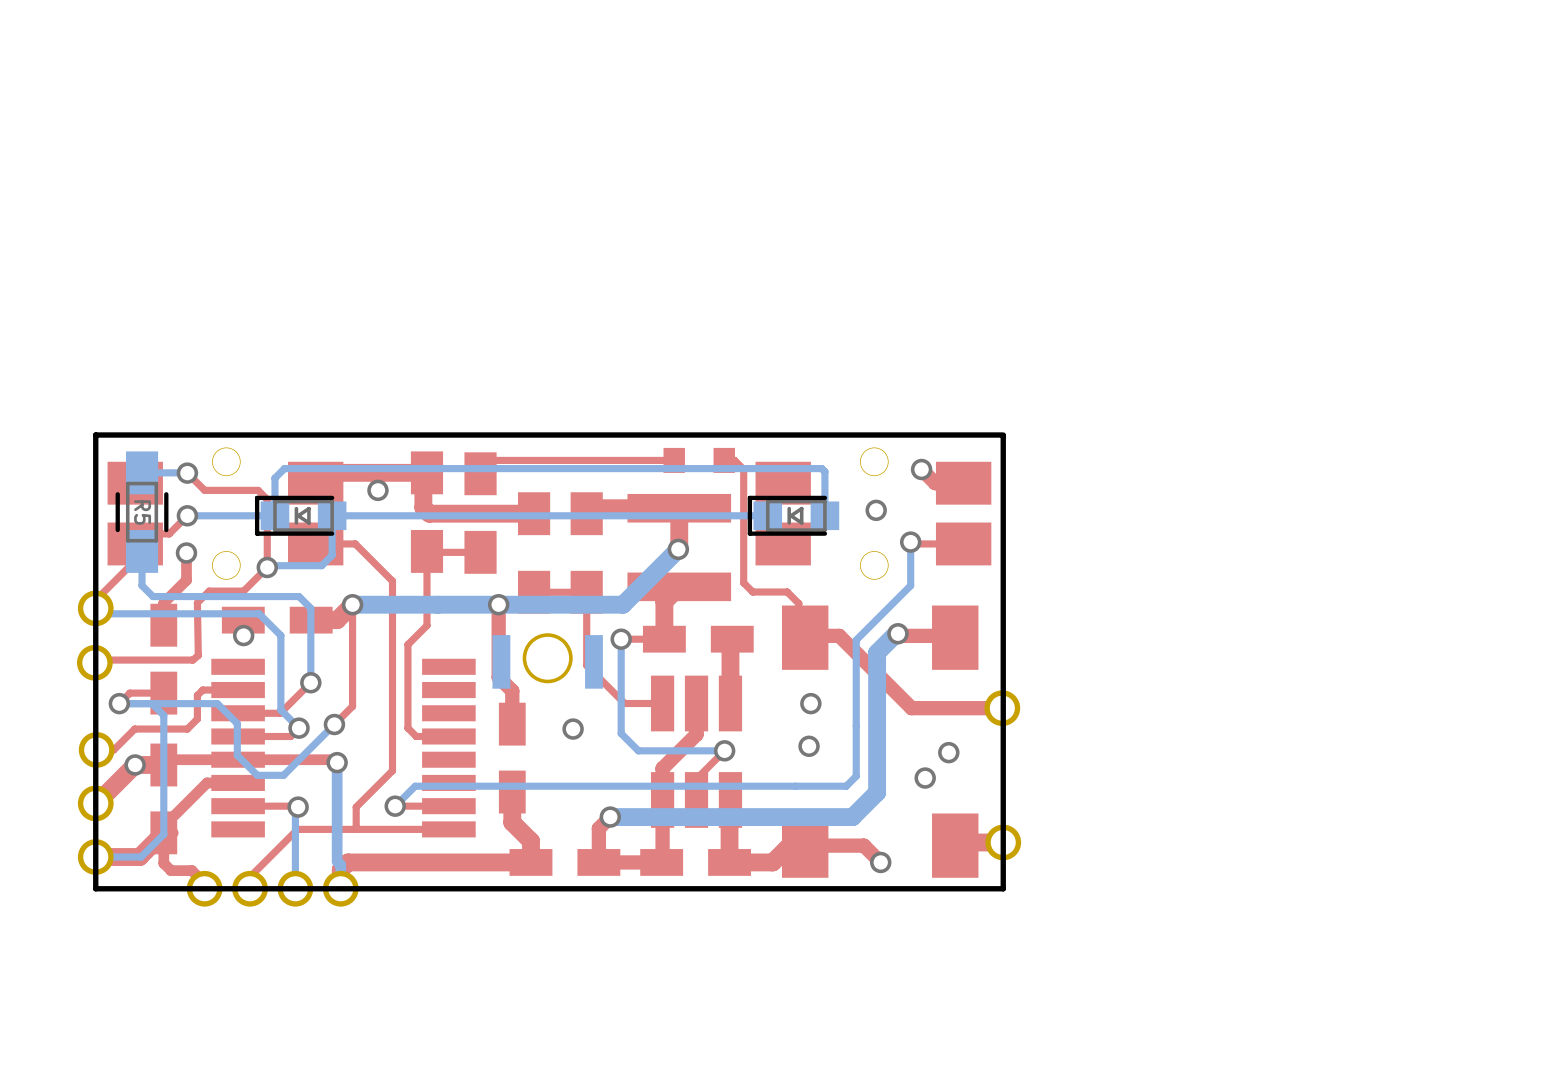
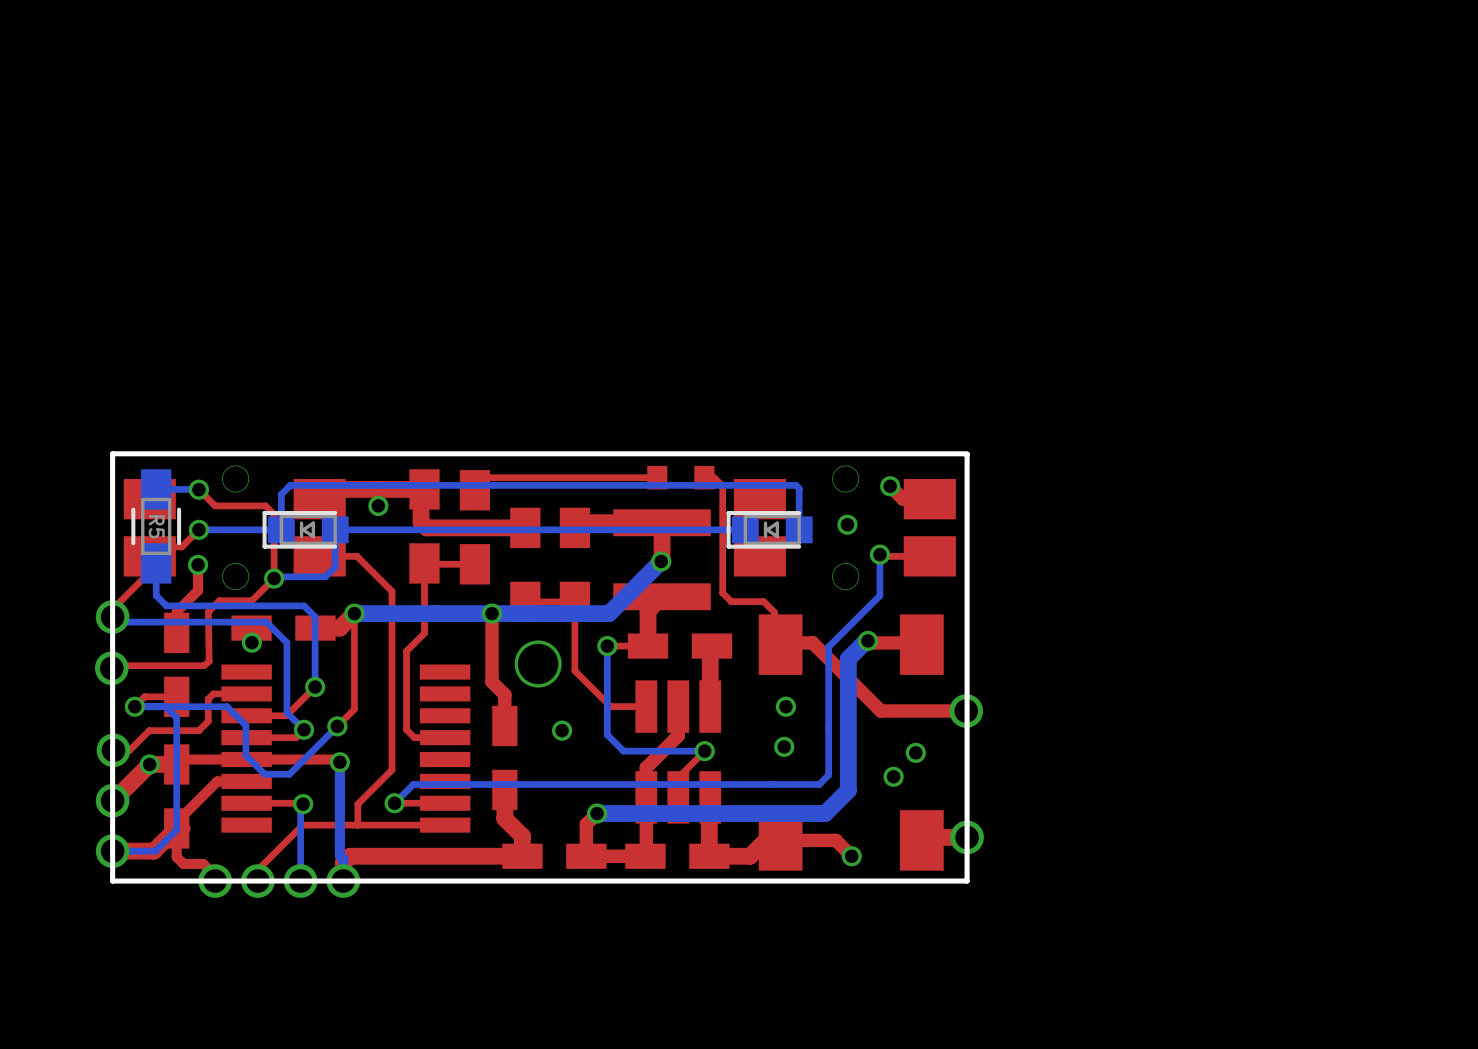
part: (501, 661) -> none
part: (593, 661) -> none

